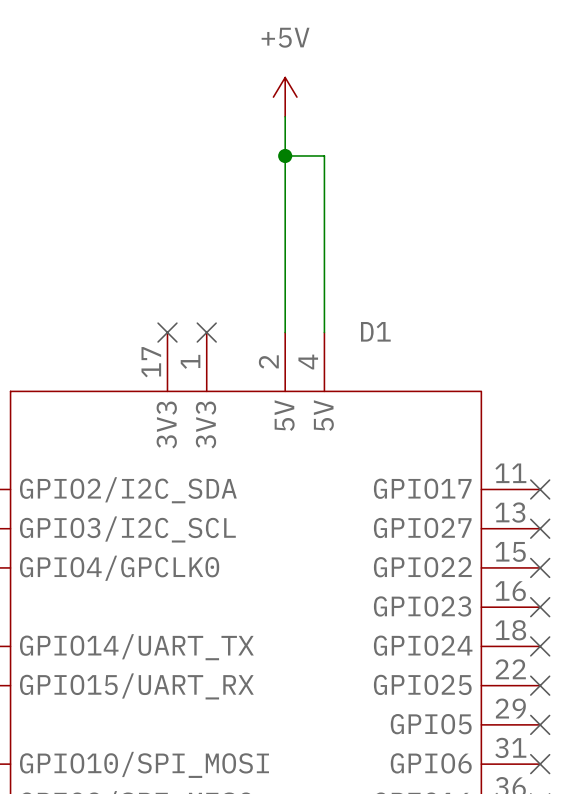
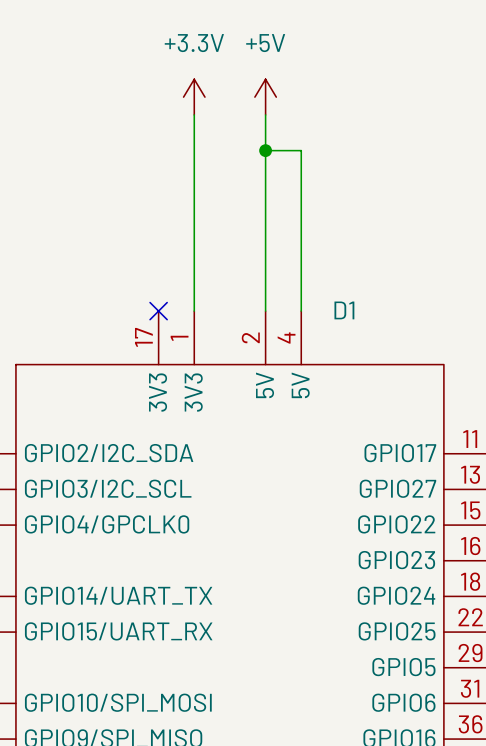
power symbol: none -> +3.3V (194, 97)
wire: none -> (194, 114) (194, 311)
no-connect mark: (206, 332) -> none

